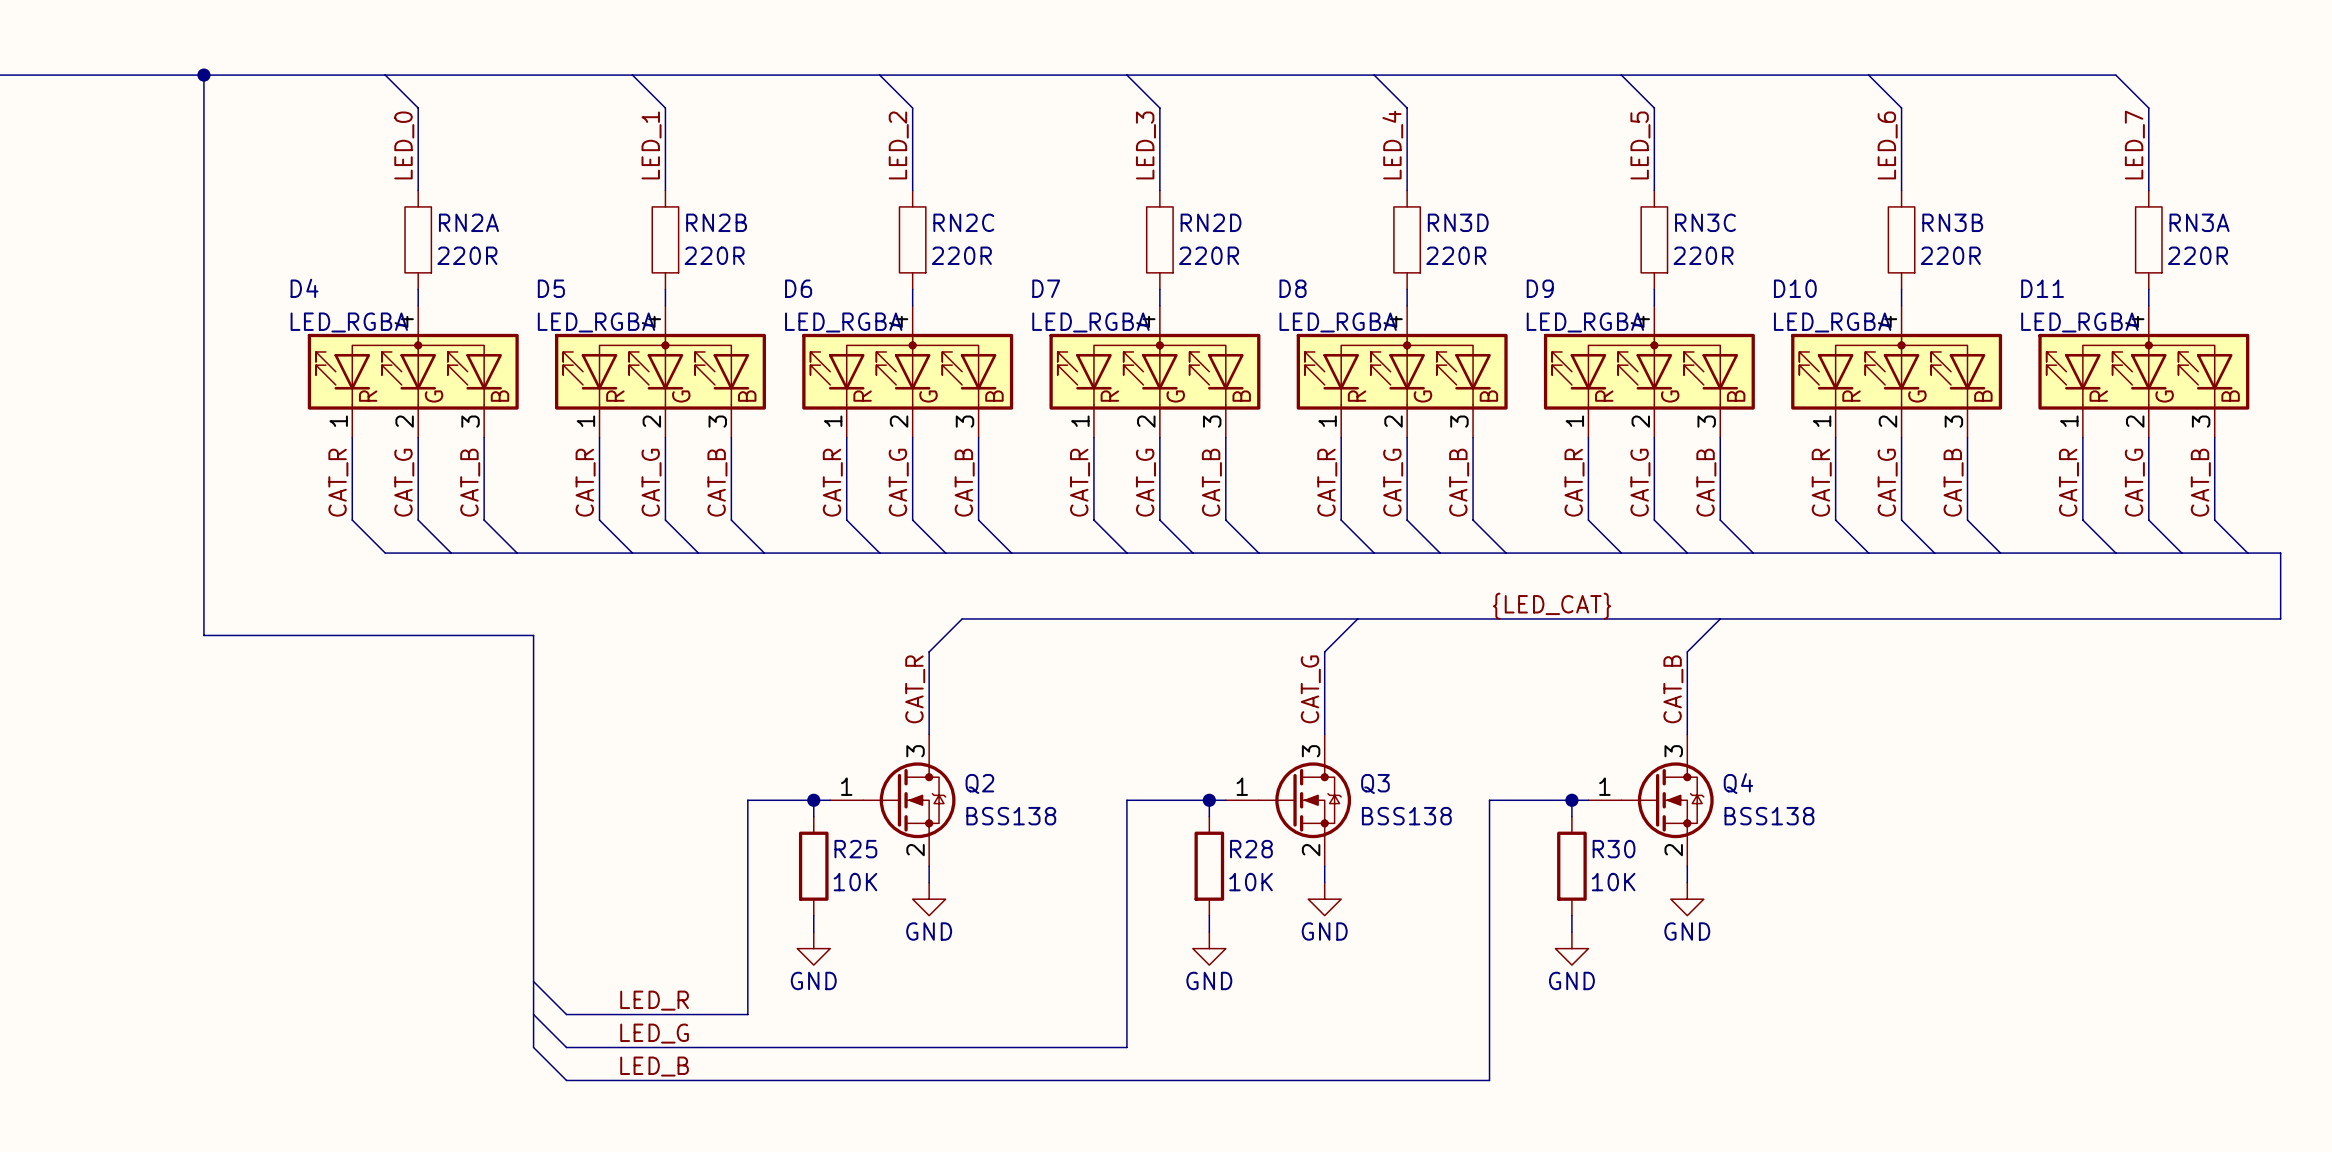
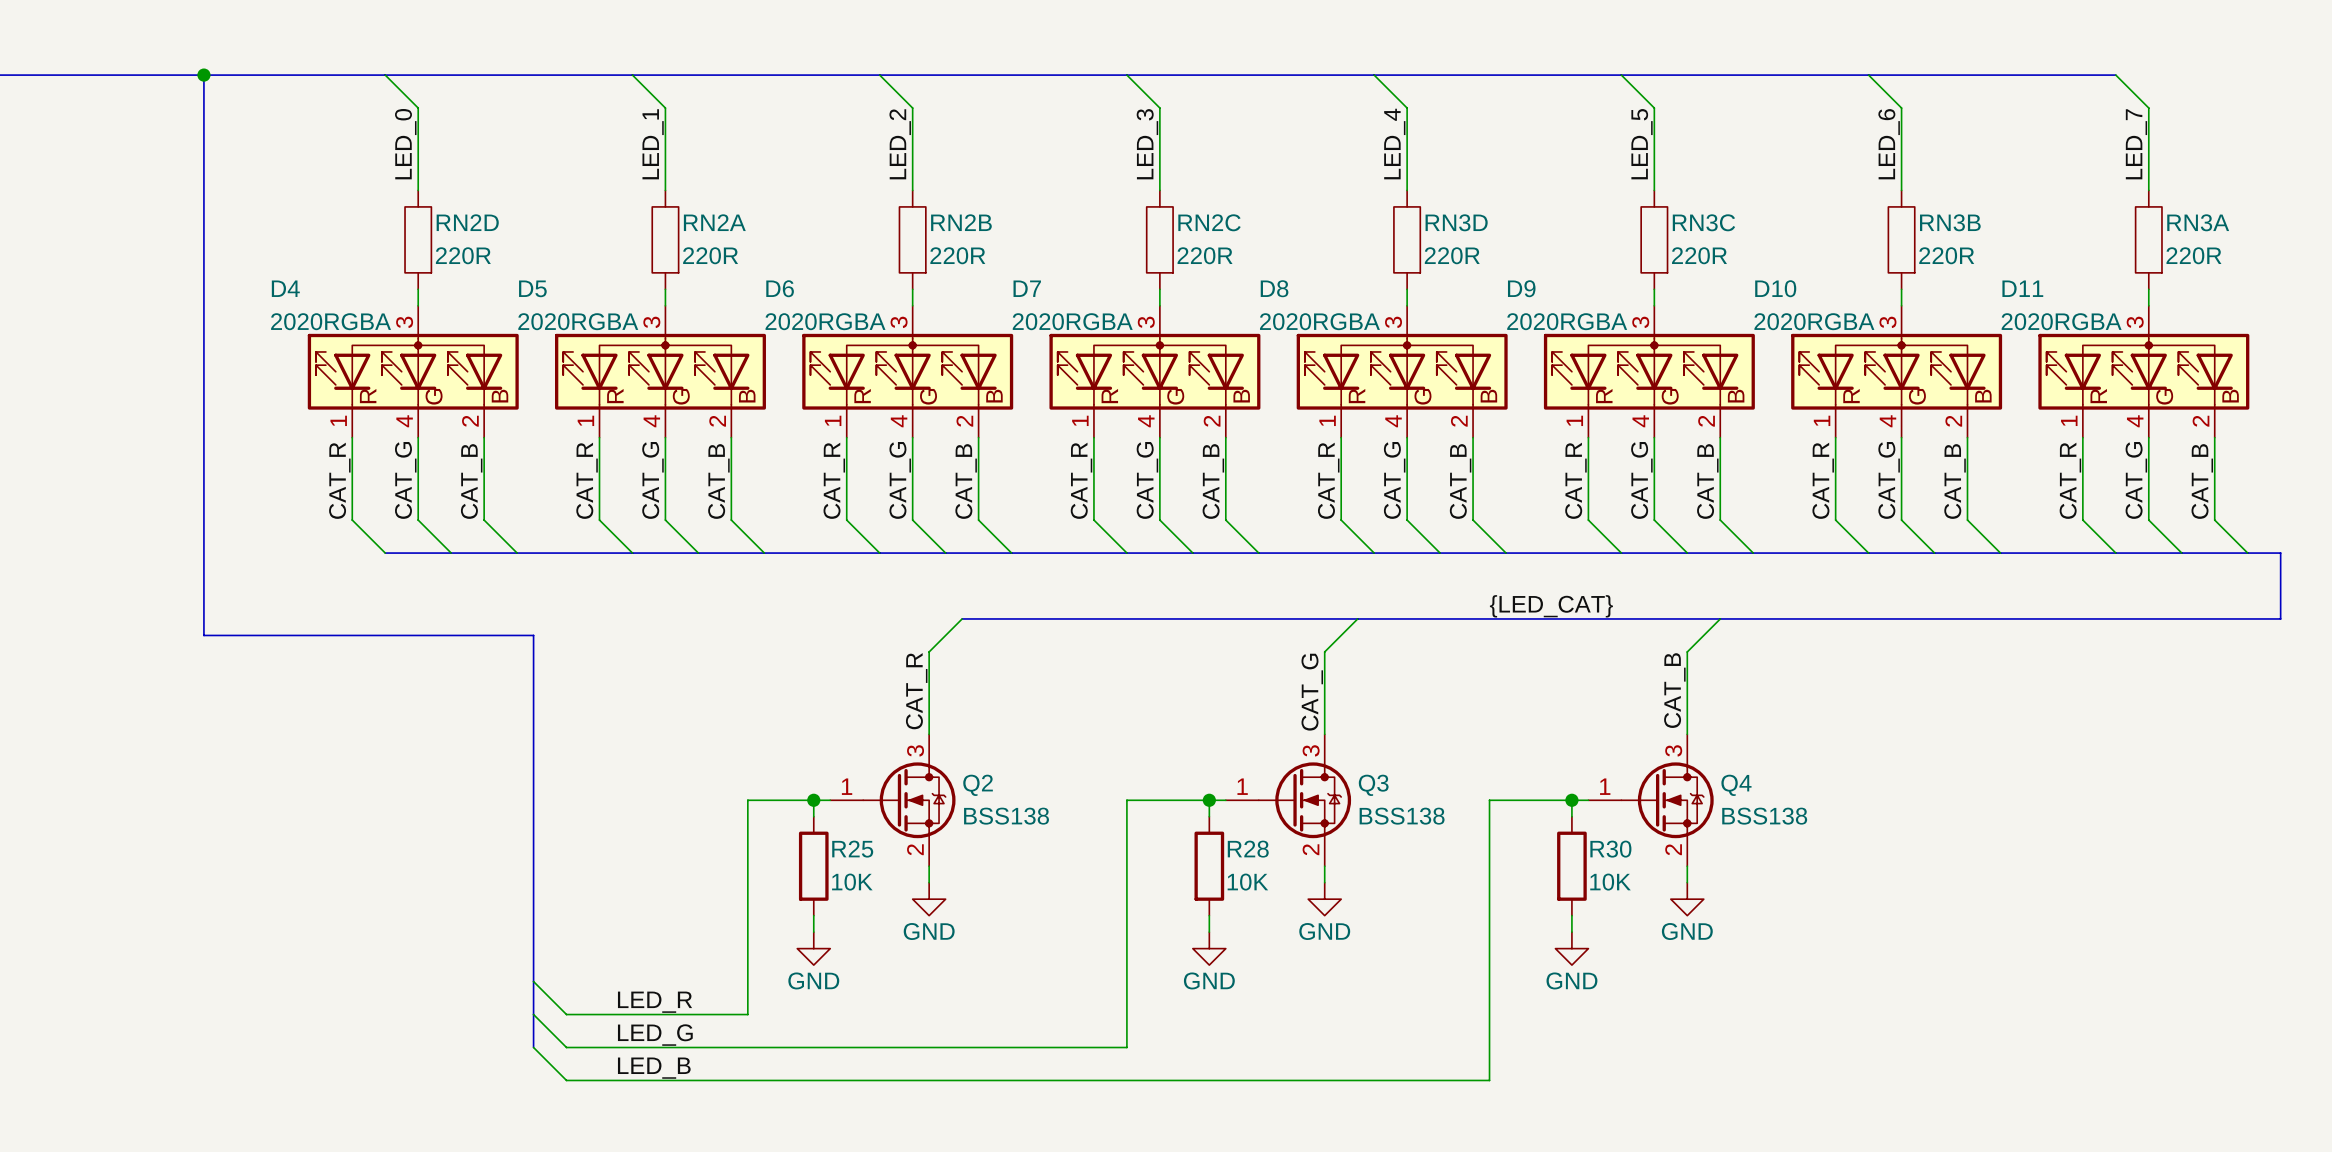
RN2A name: RN2A (468, 222) -> RN2D (467, 222)
RN2B name: RN2B (716, 222) -> RN2A (714, 222)
RN2C name: RN2C (963, 222) -> RN2B (961, 222)
RN2D name: RN2D (1211, 222) -> RN2C (1209, 222)
D4 symbol: [307, 305, 519, 438] -> [307, 305, 519, 438]
D5 symbol: [555, 305, 766, 438] -> [555, 305, 766, 438]
D6 symbol: [802, 305, 1014, 438] -> [802, 305, 1014, 438]
D7 symbol: [1049, 305, 1261, 438] -> [1049, 305, 1261, 438]
D8 symbol: [1296, 305, 1508, 438] -> [1296, 305, 1508, 438]
D9 symbol: [1543, 305, 1755, 438] -> [1543, 305, 1755, 438]
D10 symbol: [1791, 305, 2003, 438] -> [1791, 305, 2003, 438]
D11 symbol: [2038, 305, 2250, 438] -> [2038, 305, 2250, 438]
D4 value: LED_RGBA (349, 322) -> 2020RGBA (331, 321)
D5 value: LED_RGBA (596, 322) -> 2020RGBA (578, 321)
D6 value: LED_RGBA (843, 322) -> 2020RGBA (825, 321)
D7 value: LED_RGBA (1090, 322) -> 2020RGBA (1072, 321)
D8 value: LED_RGBA (1338, 322) -> 2020RGBA (1319, 321)
D9 value: LED_RGBA (1585, 322) -> 2020RGBA (1567, 321)
D10 value: LED_RGBA (1832, 322) -> 2020RGBA (1814, 321)
D11 value: LED_RGBA (2079, 322) -> 2020RGBA (2061, 321)

